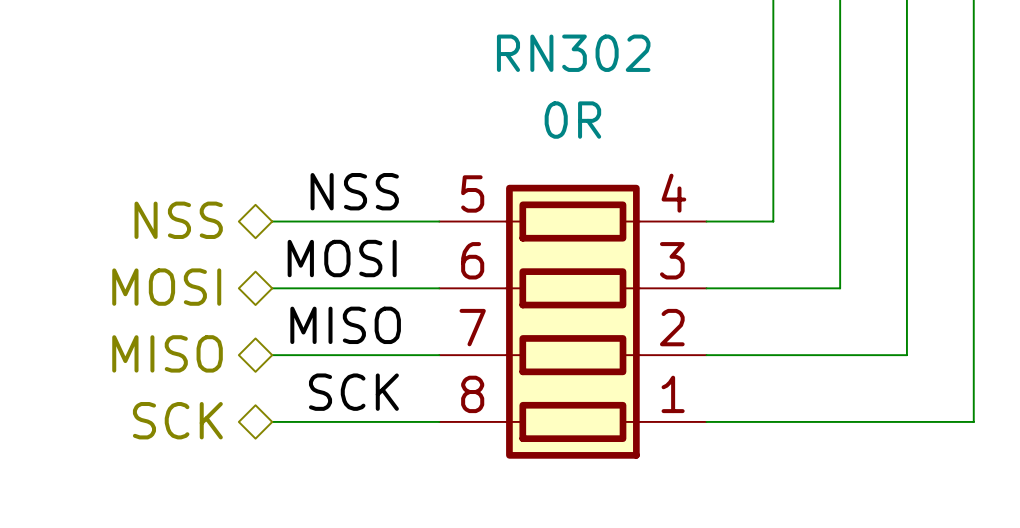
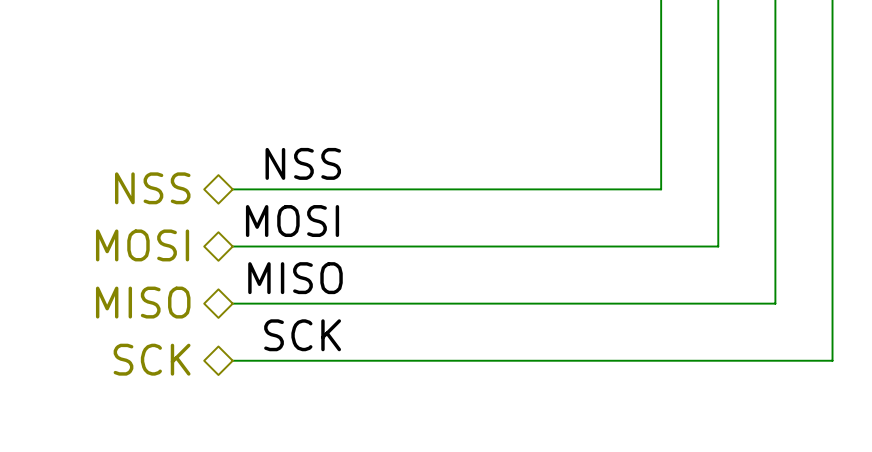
RN302: 0R (572, 321) -> none

